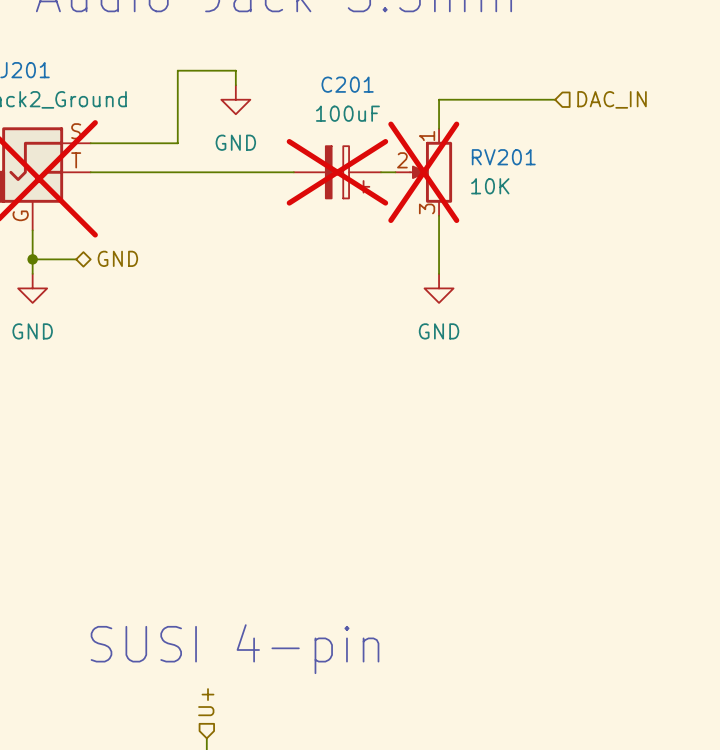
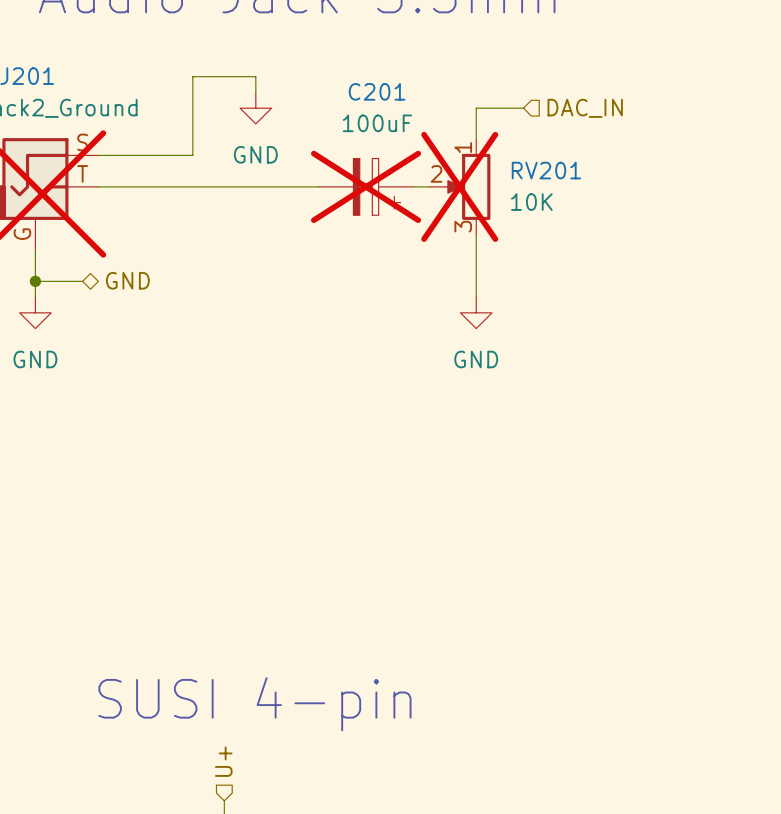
wire: (482, 99) (555, 99) -> none
hierarchical label position: DAC_IN (612, 99) -> DAC_IN (585, 108)

